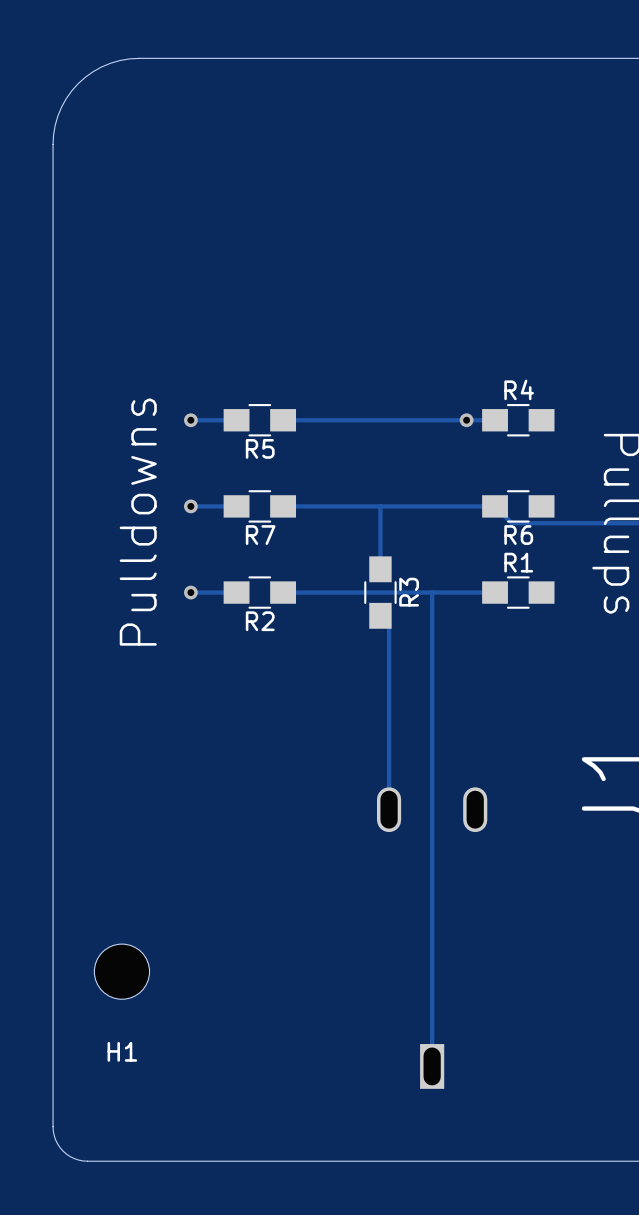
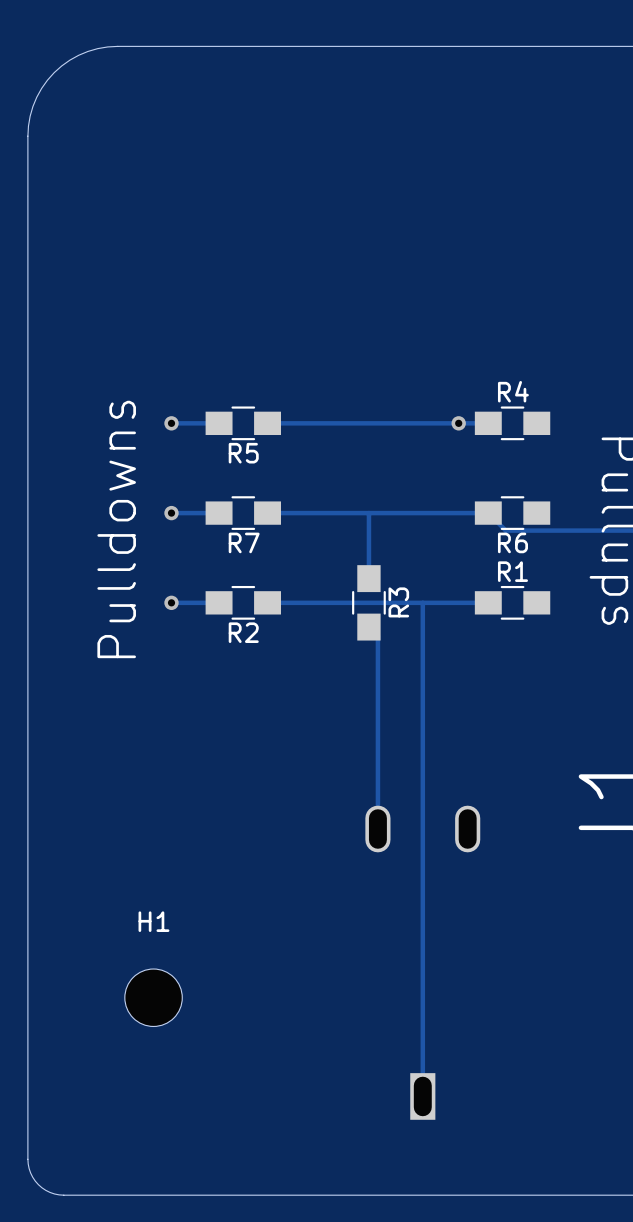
H1 position: (121, 971) -> (153, 997)
H1 name position: H1 (122, 1051) -> H1 (153, 921)

